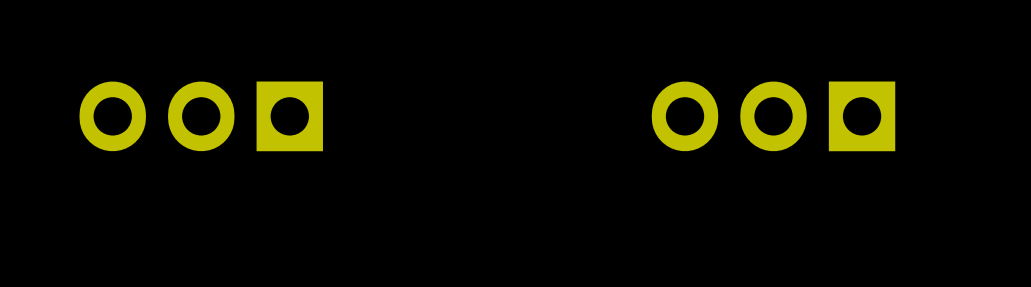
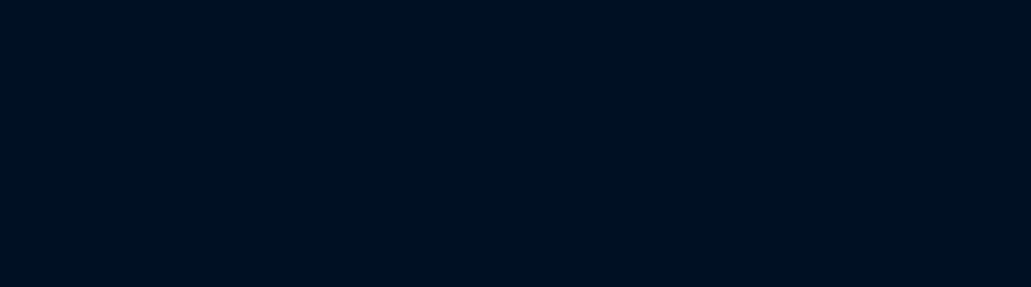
part: (201, 116) -> none
part: (773, 116) -> none

